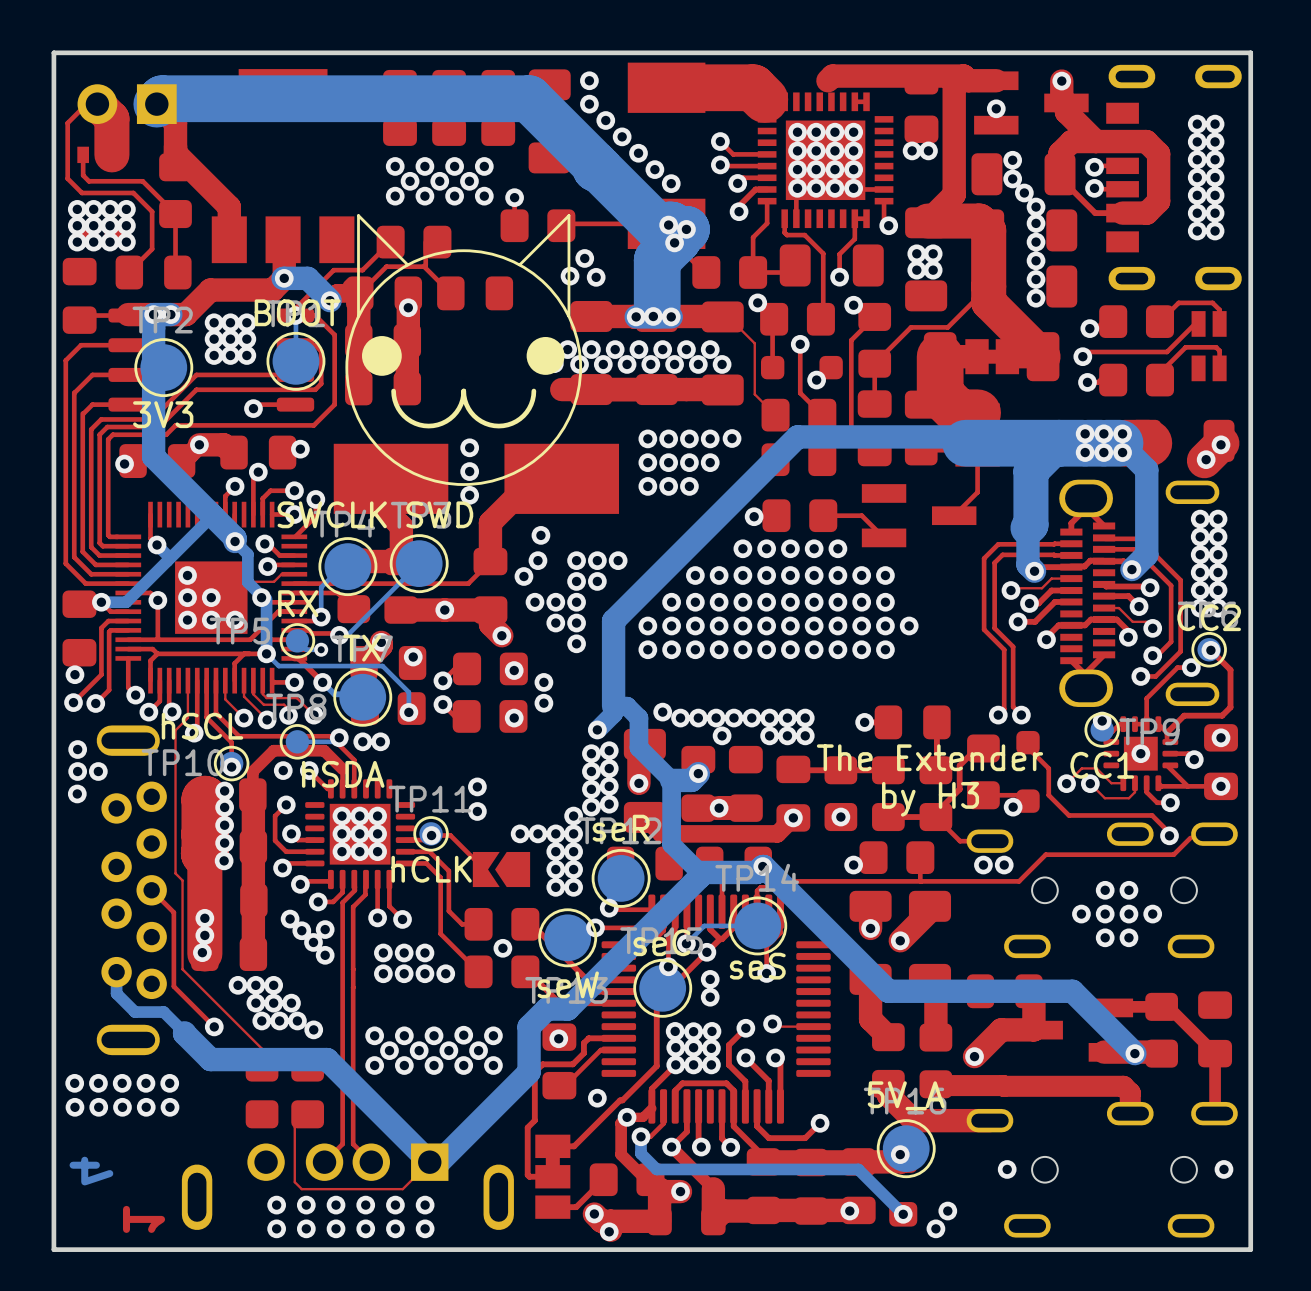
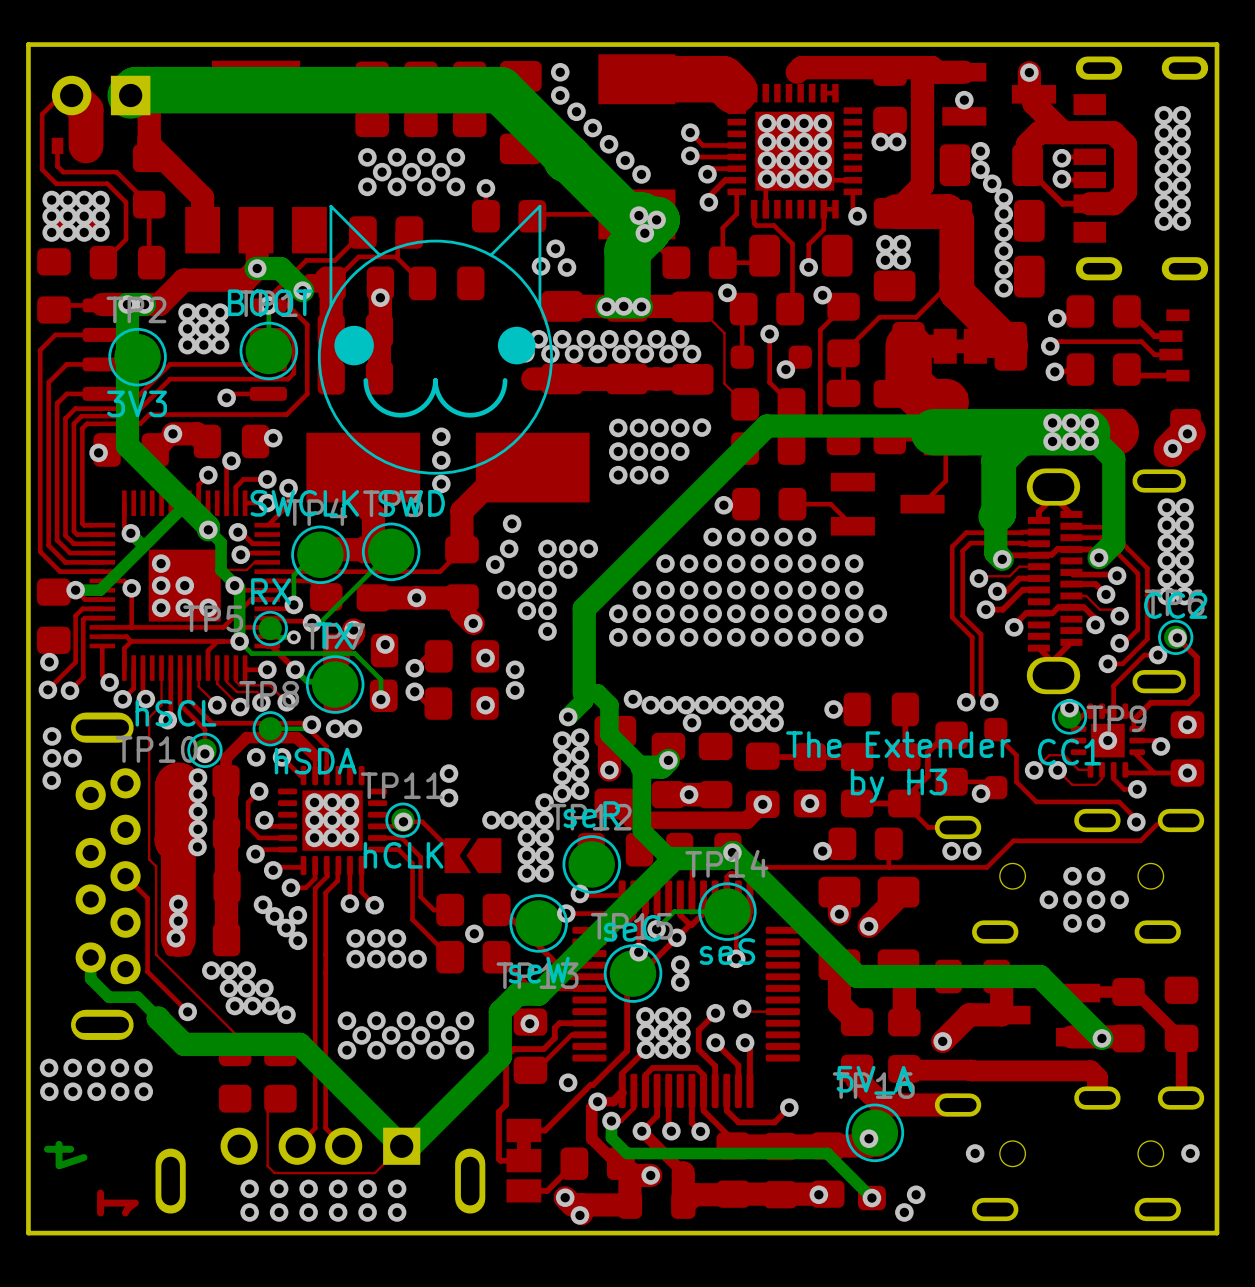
part footprint: [1191, 311, 1227, 382] -> [1159, 309, 1190, 382]
top track: (1198, 315) (1198, 320) (1167, 352) -> (1170, 354) (1154, 354) (1141, 341) (1133, 341)
top track: (1159, 321) (1178, 302) (1212, 302) (1219, 309) (1219, 323) -> none
top track: none -> (1130, 311) (1154, 336) (1170, 336)
top track: (1219, 368) (1219, 350) (1216, 347) (1185, 347) (1159, 373) (1159, 380) -> none
top track: none -> (1177, 375) (1132, 375)

